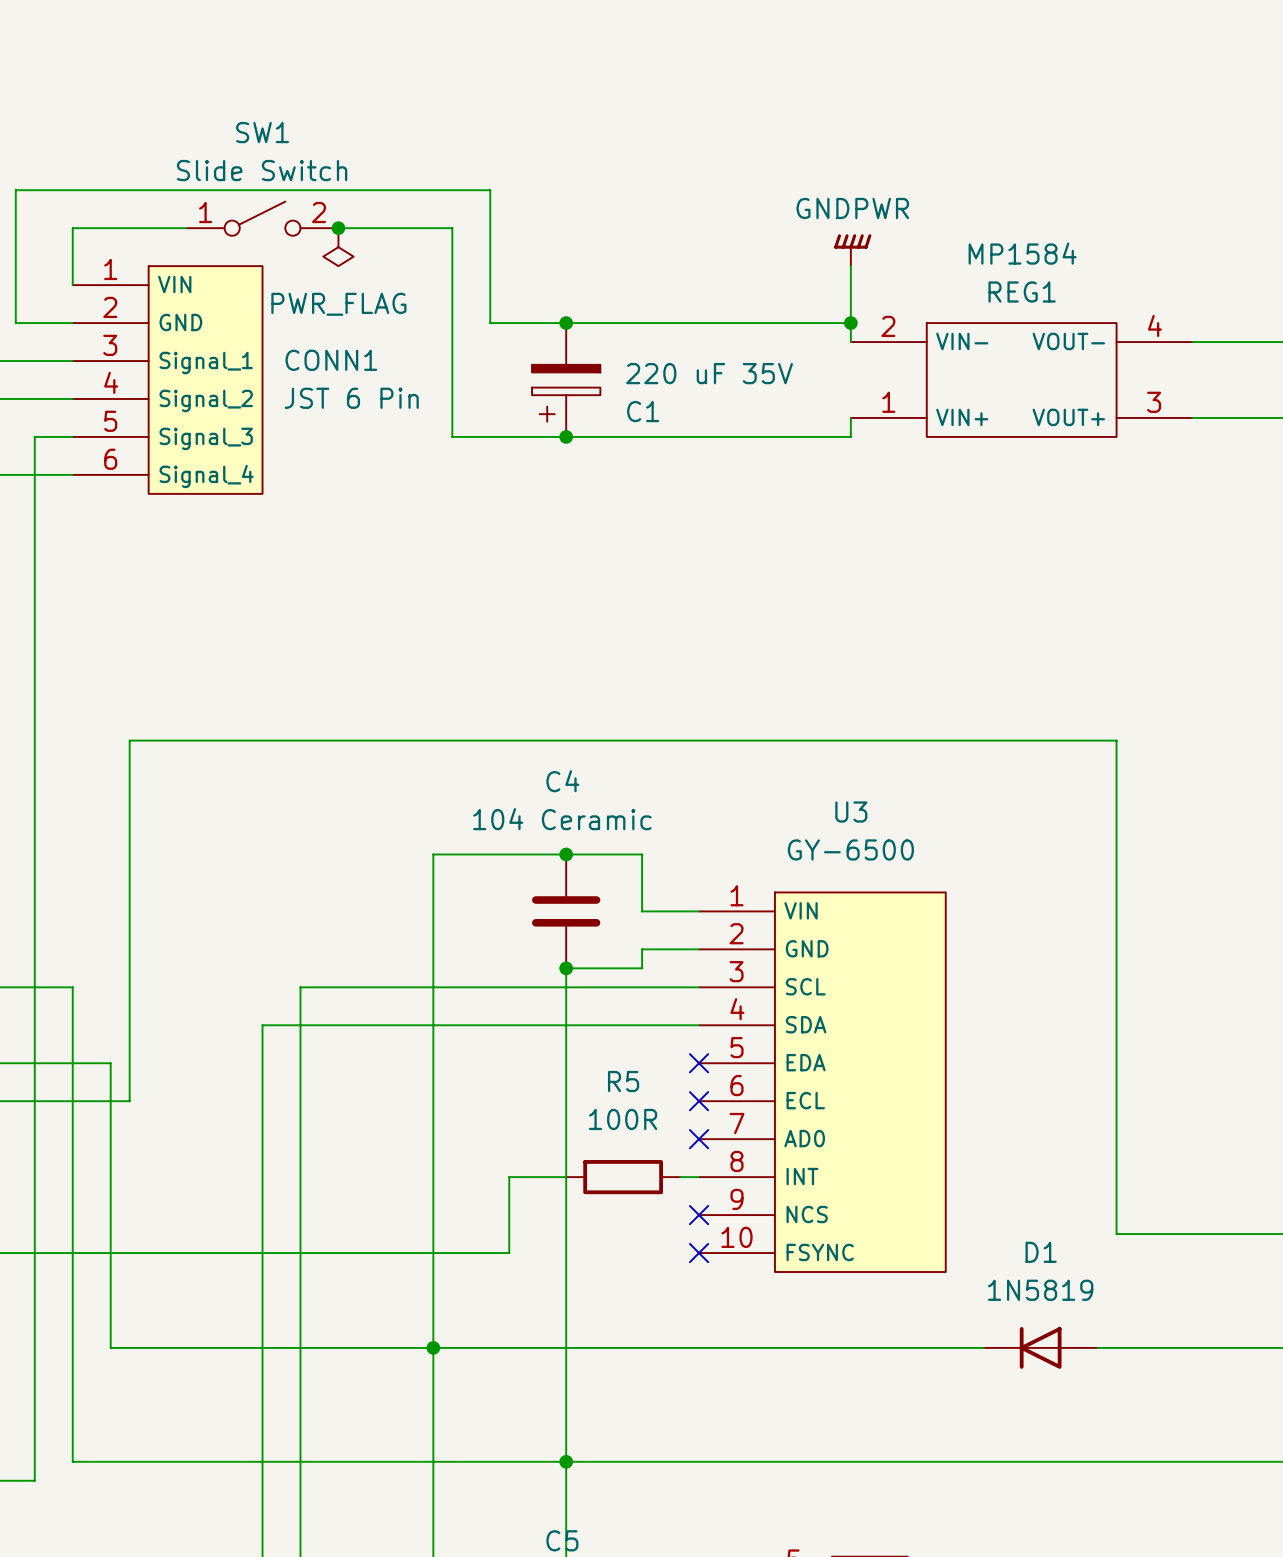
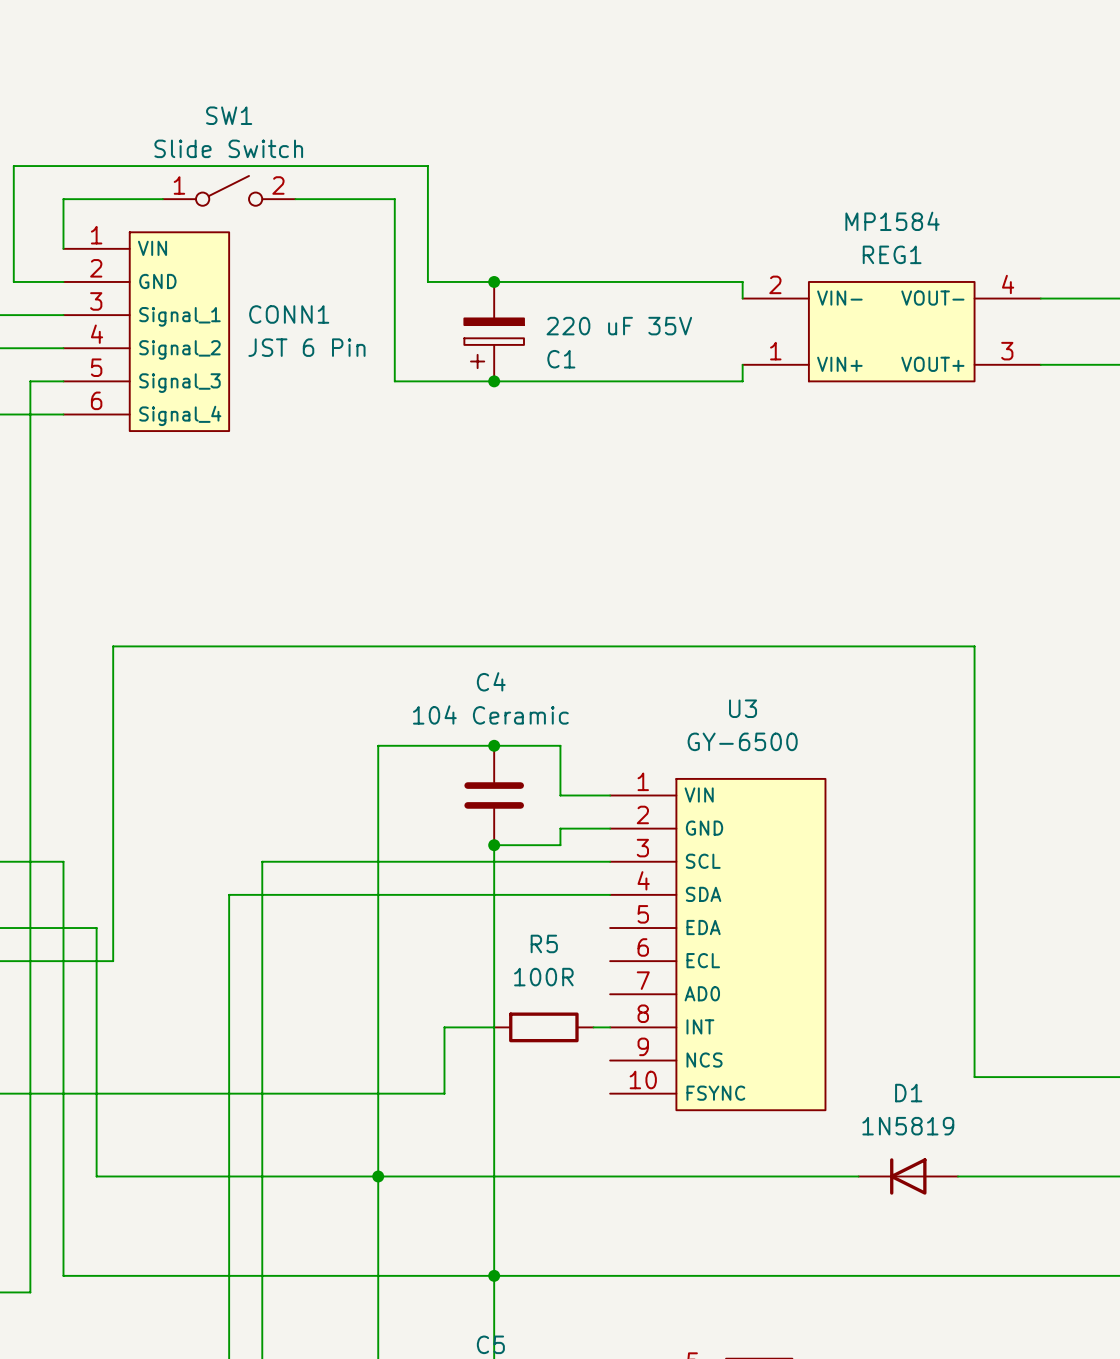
junction: (338, 228) -> none
power symbol: PWR_FLAG (338, 247) -> none
power symbol: GNDPWR (852, 250) -> none
wire: (850, 266) (850, 323) -> none
junction: (850, 323) -> none
REG1 symbol: [850, 323, 1193, 437] -> [742, 281, 1041, 382]
no-connect mark: (699, 1063) -> none
no-connect mark: (699, 1101) -> none
no-connect mark: (699, 1139) -> none
no-connect mark: (699, 1215) -> none
no-connect mark: (699, 1253) -> none

